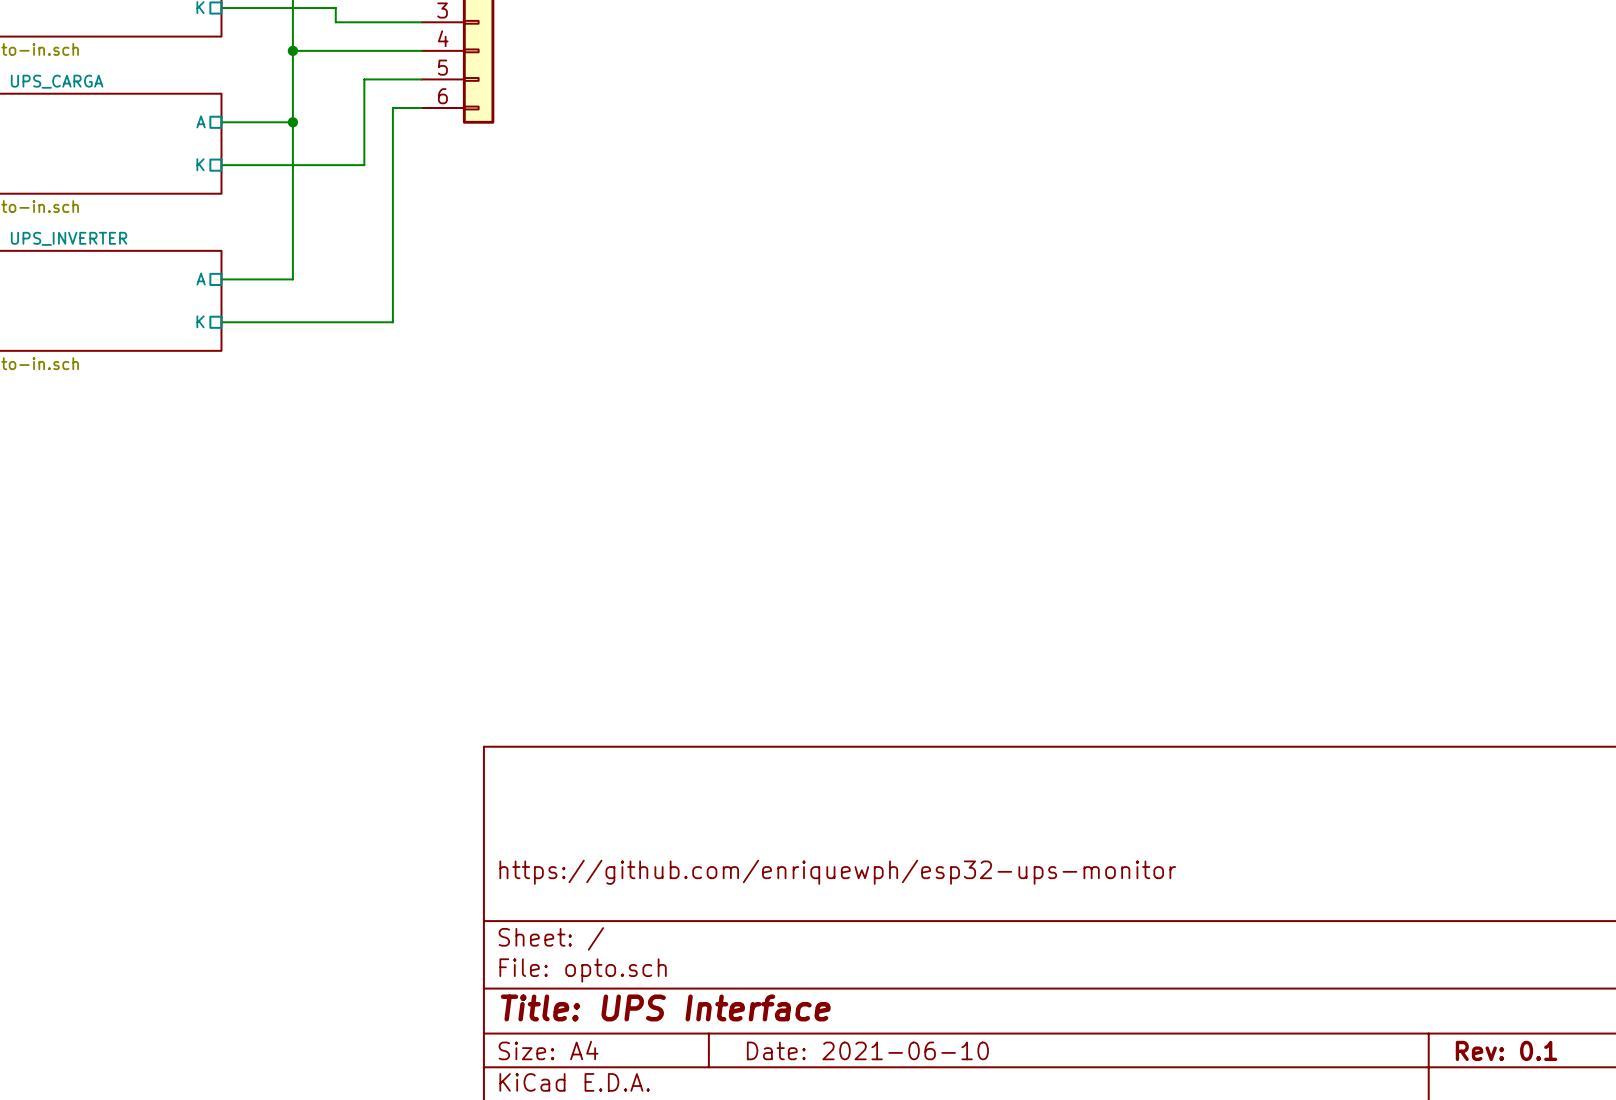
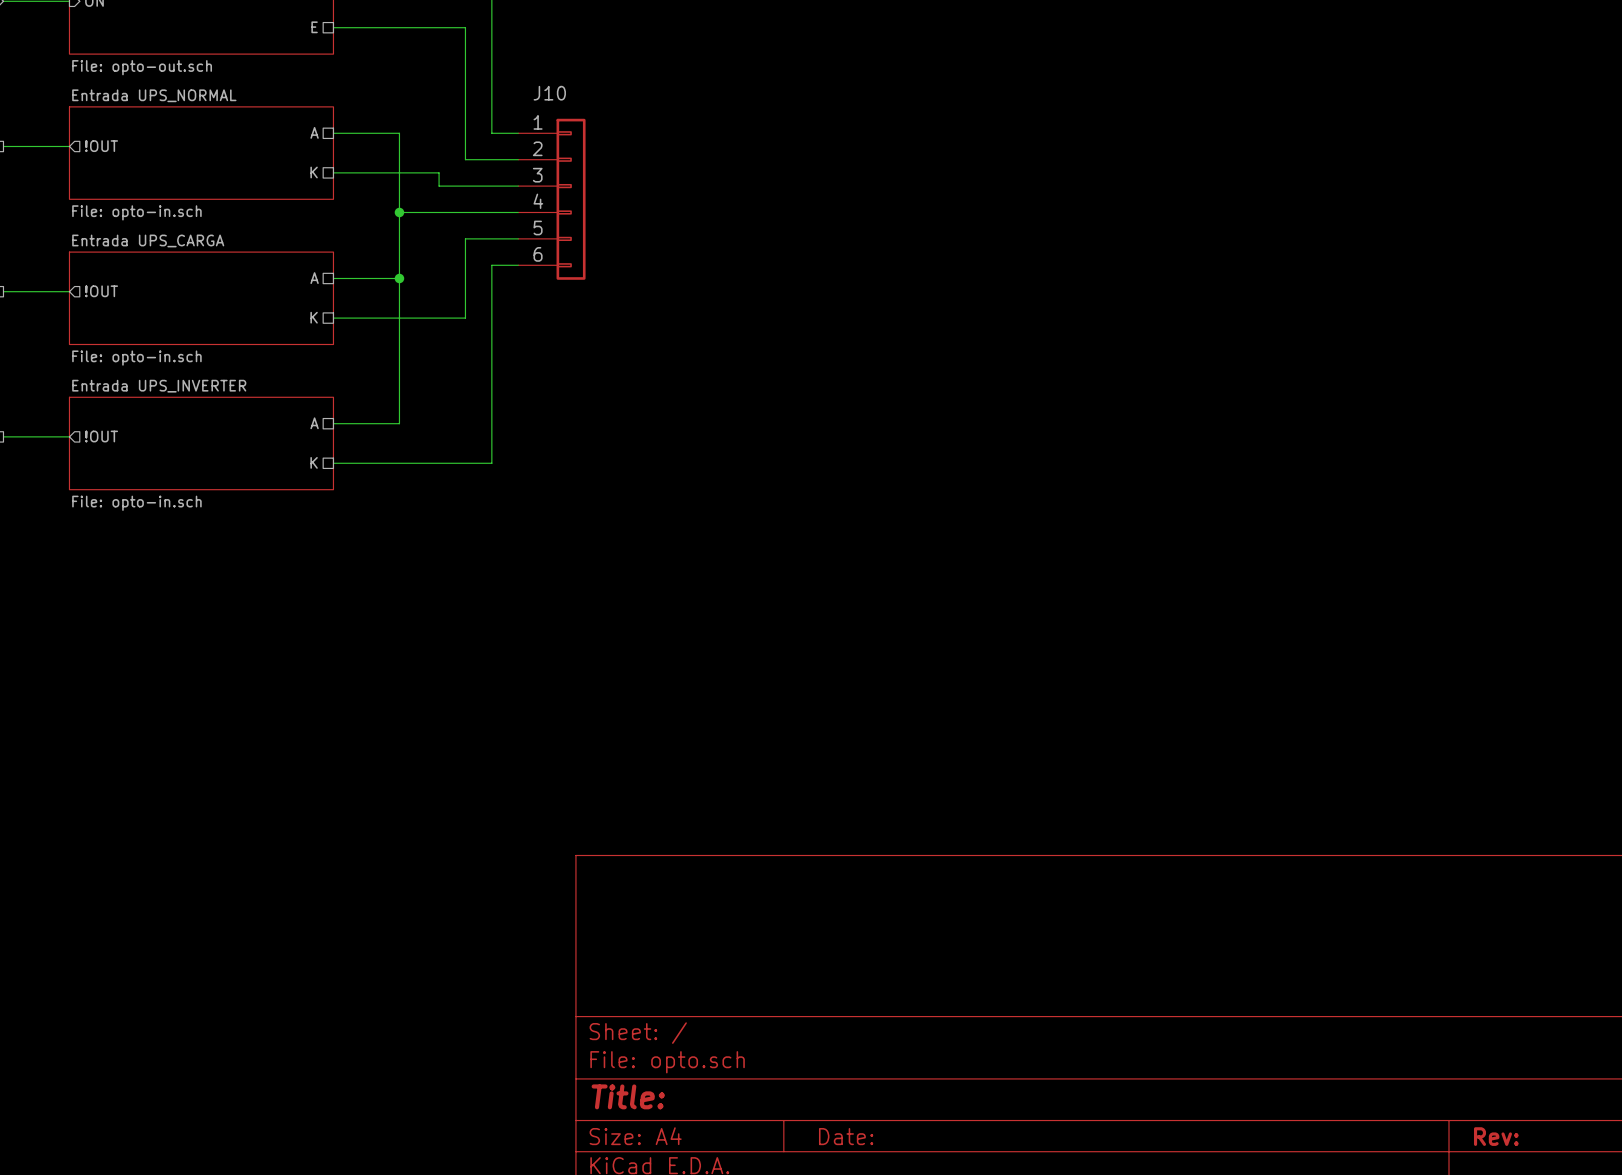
title block: https://github.com/enriquewph/esp32-ups-monitor (837, 872) -> none
title block: Title: UPS Interface (665, 1007) -> Title: (628, 1096)
title block: Date: 2021-06-10 (867, 1050) -> Date: (846, 1136)
title block: Rev: 0.1 (1506, 1050) -> Rev: (1496, 1136)

